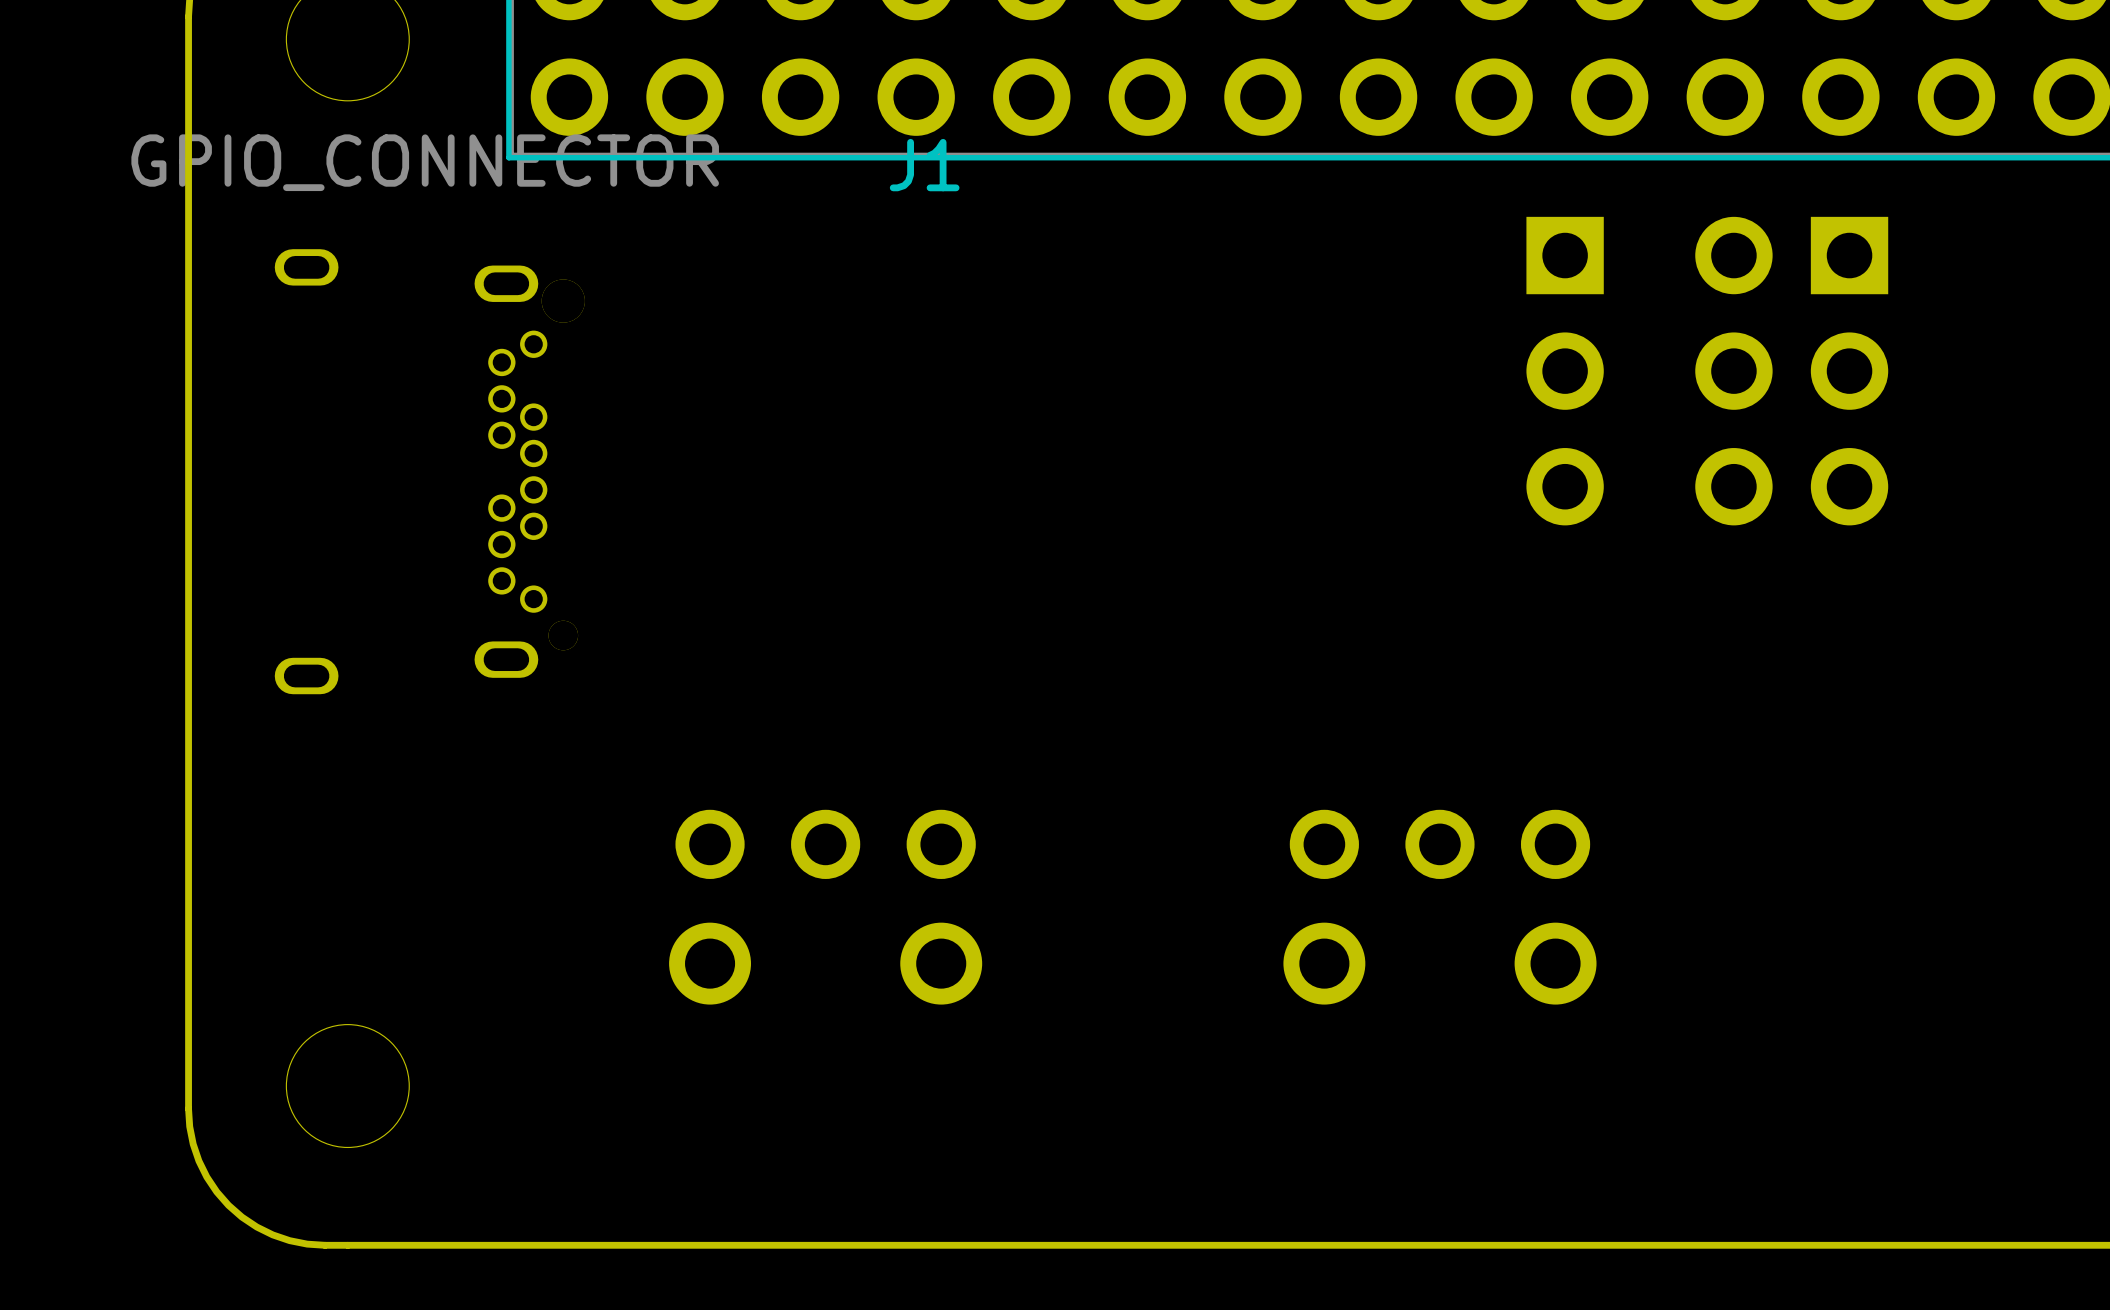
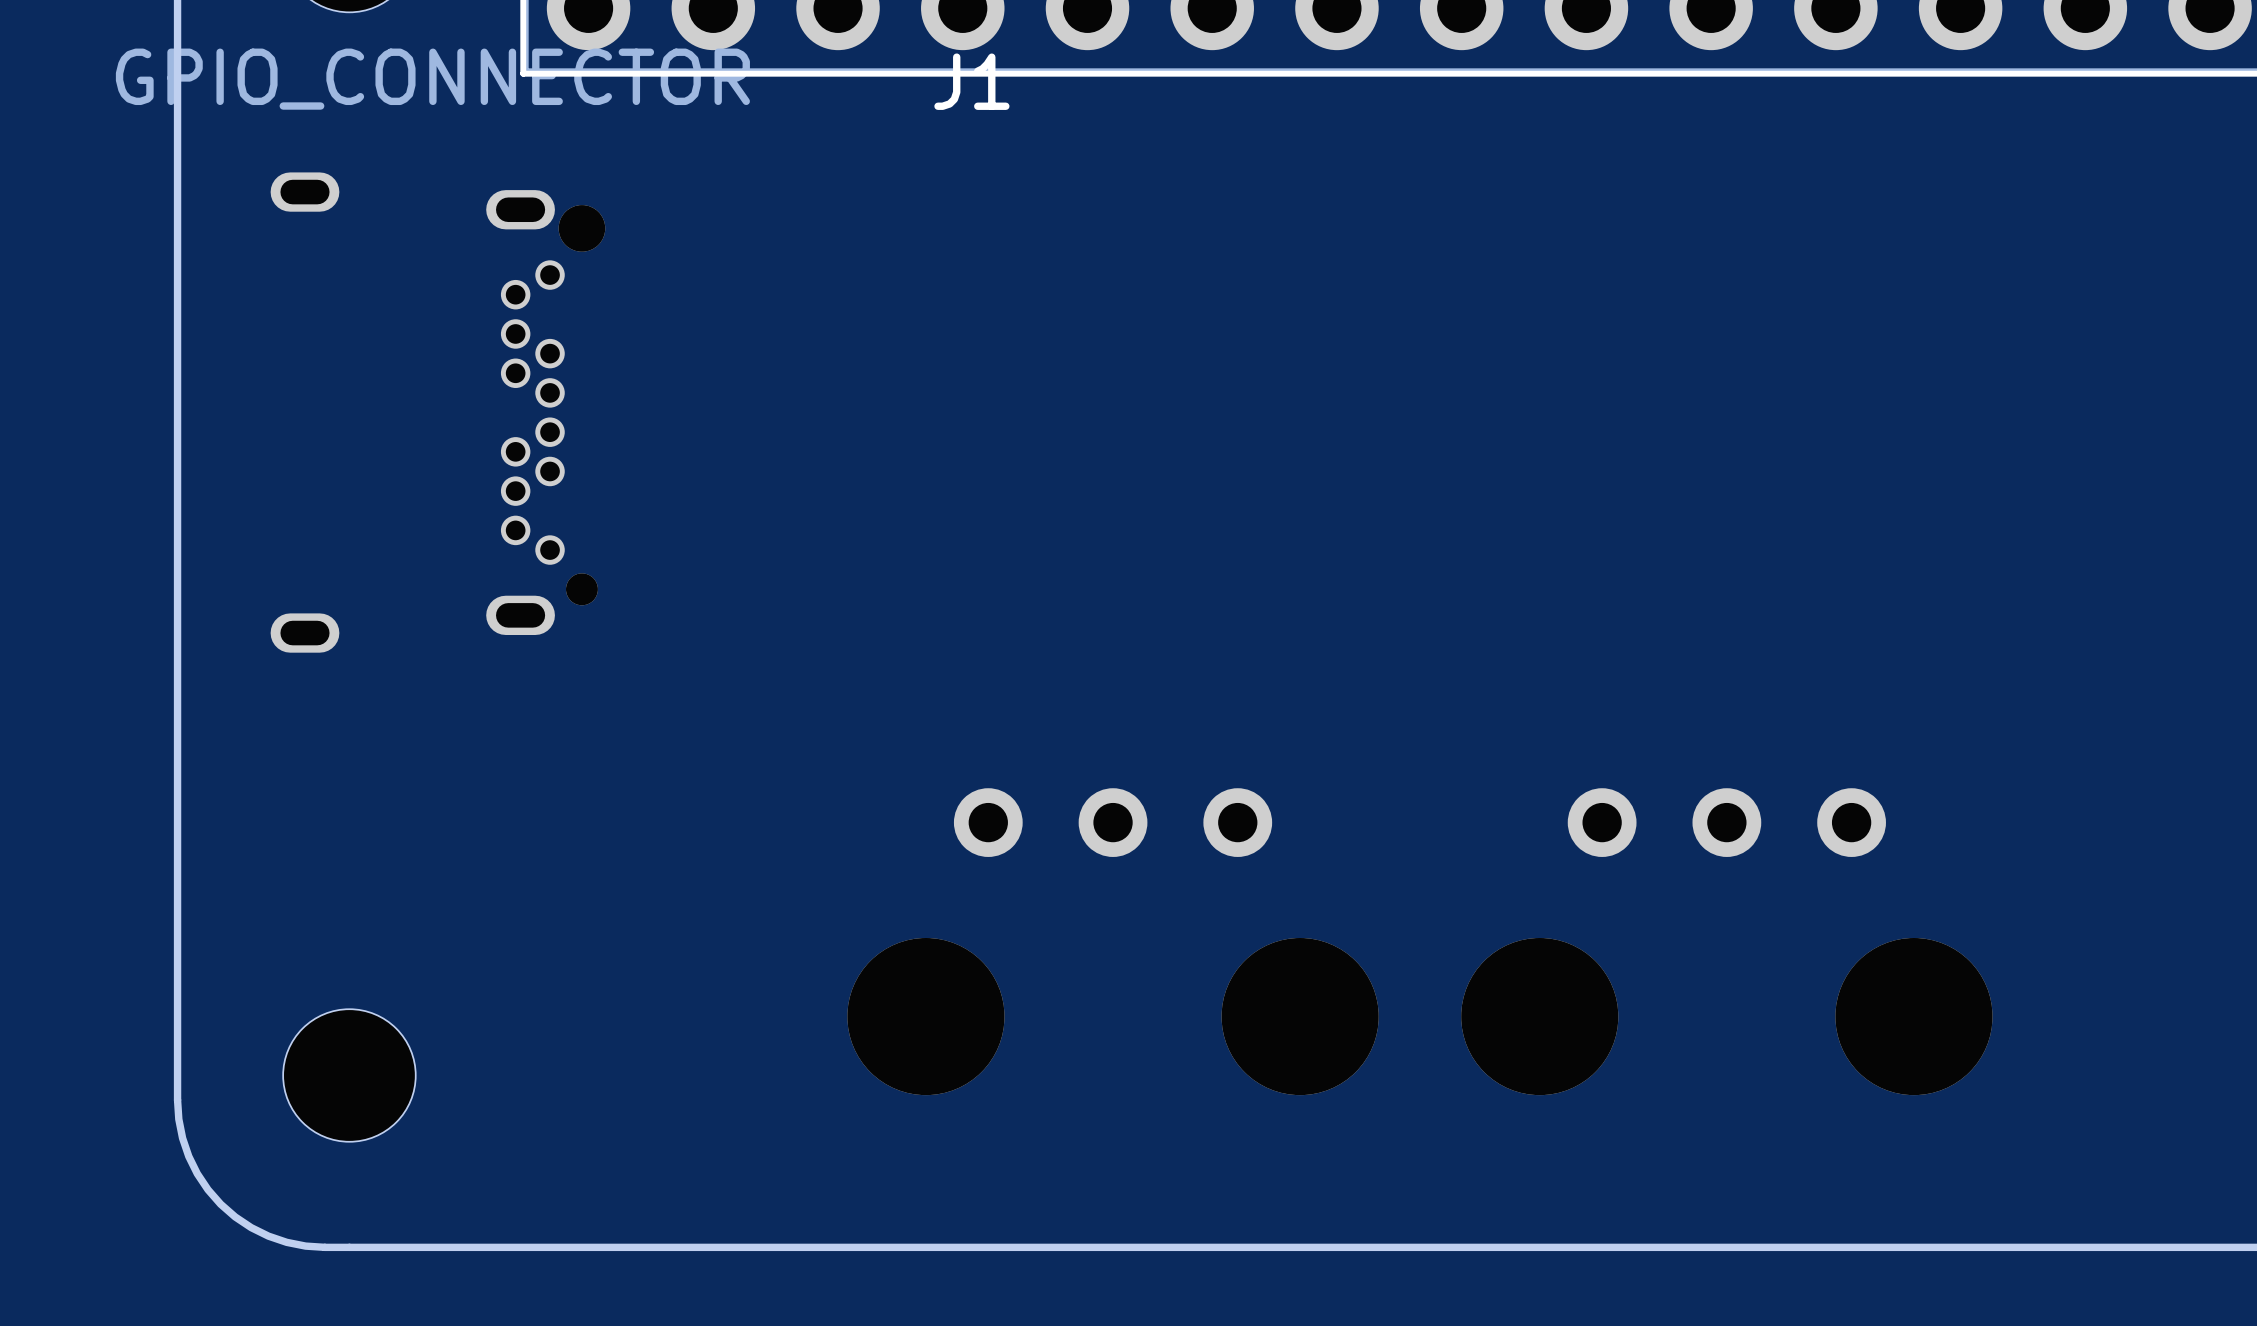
part: (1565, 371) -> none
part: (1791, 371) -> none
part: (825, 907) -> none
part: (1439, 907) -> none
part: none -> (1113, 941)
part: none -> (1726, 941)

